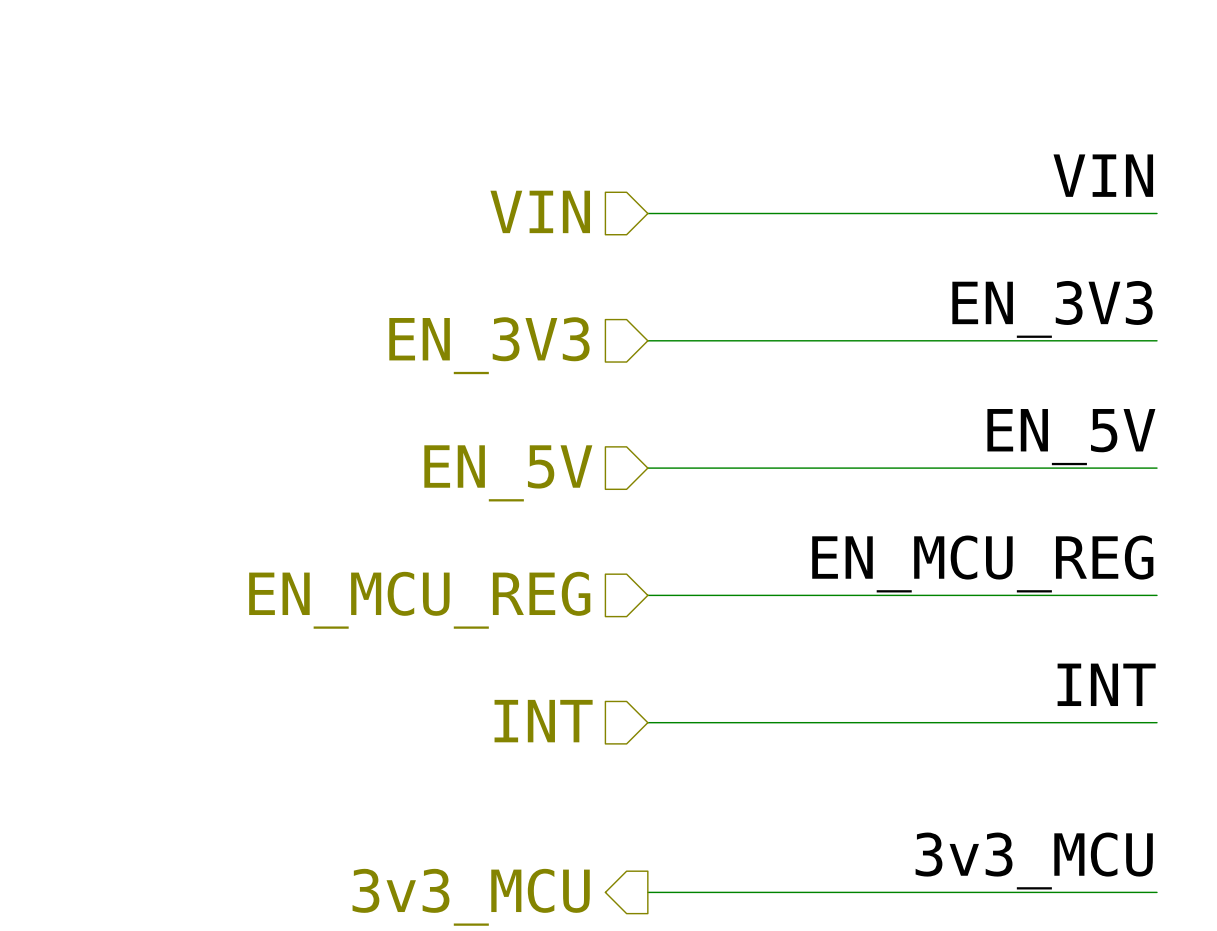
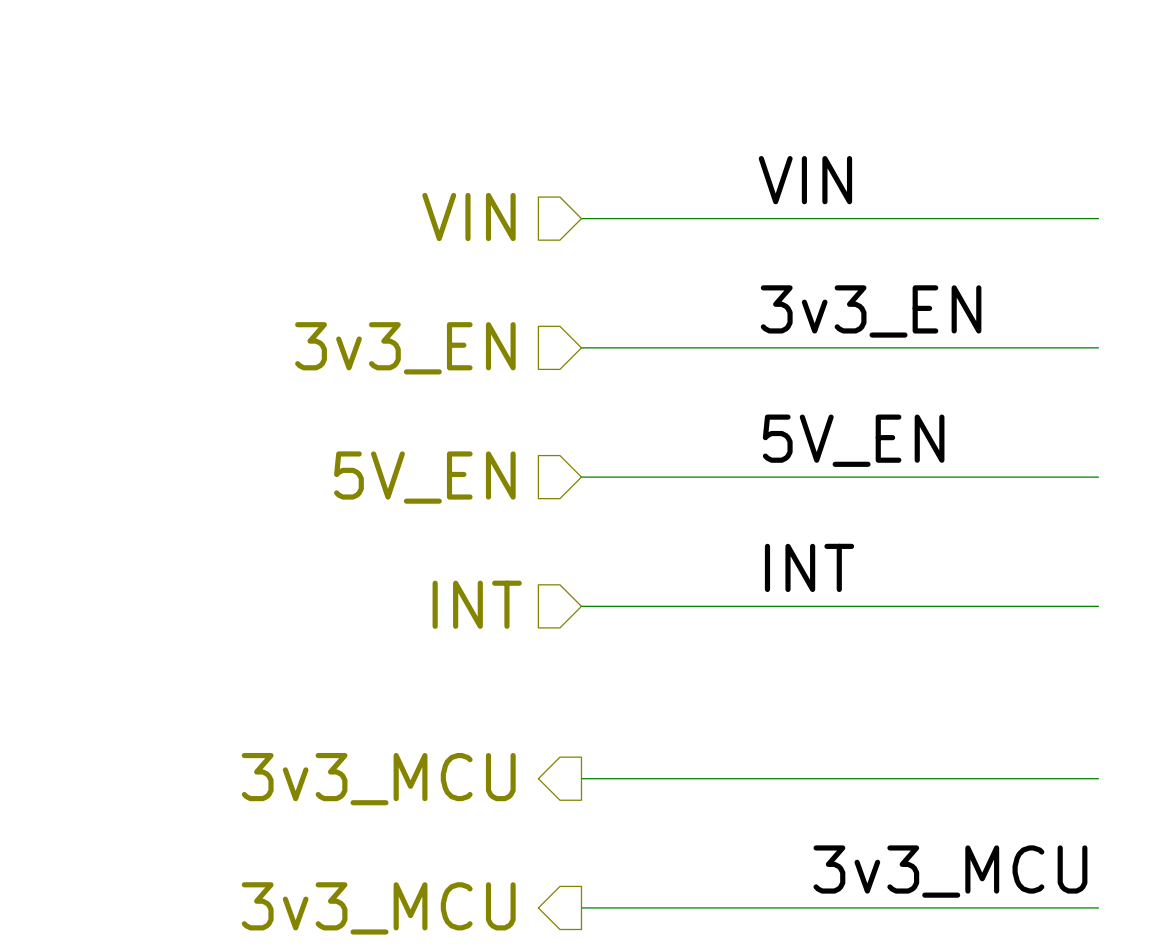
label position: VIN (1103, 175) -> VIN (805, 180)
label: none -> 3v3_EN (871, 311)
label: EN_3V3 (1052, 309) -> none
hierarchical label: EN_3V3 (489, 345) -> 3v3_EN (405, 348)
label: none -> 5V_EN (853, 440)
label: EN_5V (1071, 437) -> none
hierarchical label: EN_5V (508, 473) -> 5V_EN (424, 477)
label: EN_MCU_REG (982, 564) -> none
hierarchical label: EN_MCU_REG (419, 600) -> INT (477, 604)
label position: INT (1106, 684) -> INT (809, 567)
hierarchical label: INT (543, 721) -> none
wire: (647, 722) (1157, 722) -> (581, 778) (1098, 778)
hierarchical label: none -> 3v3_MCU (378, 779)

